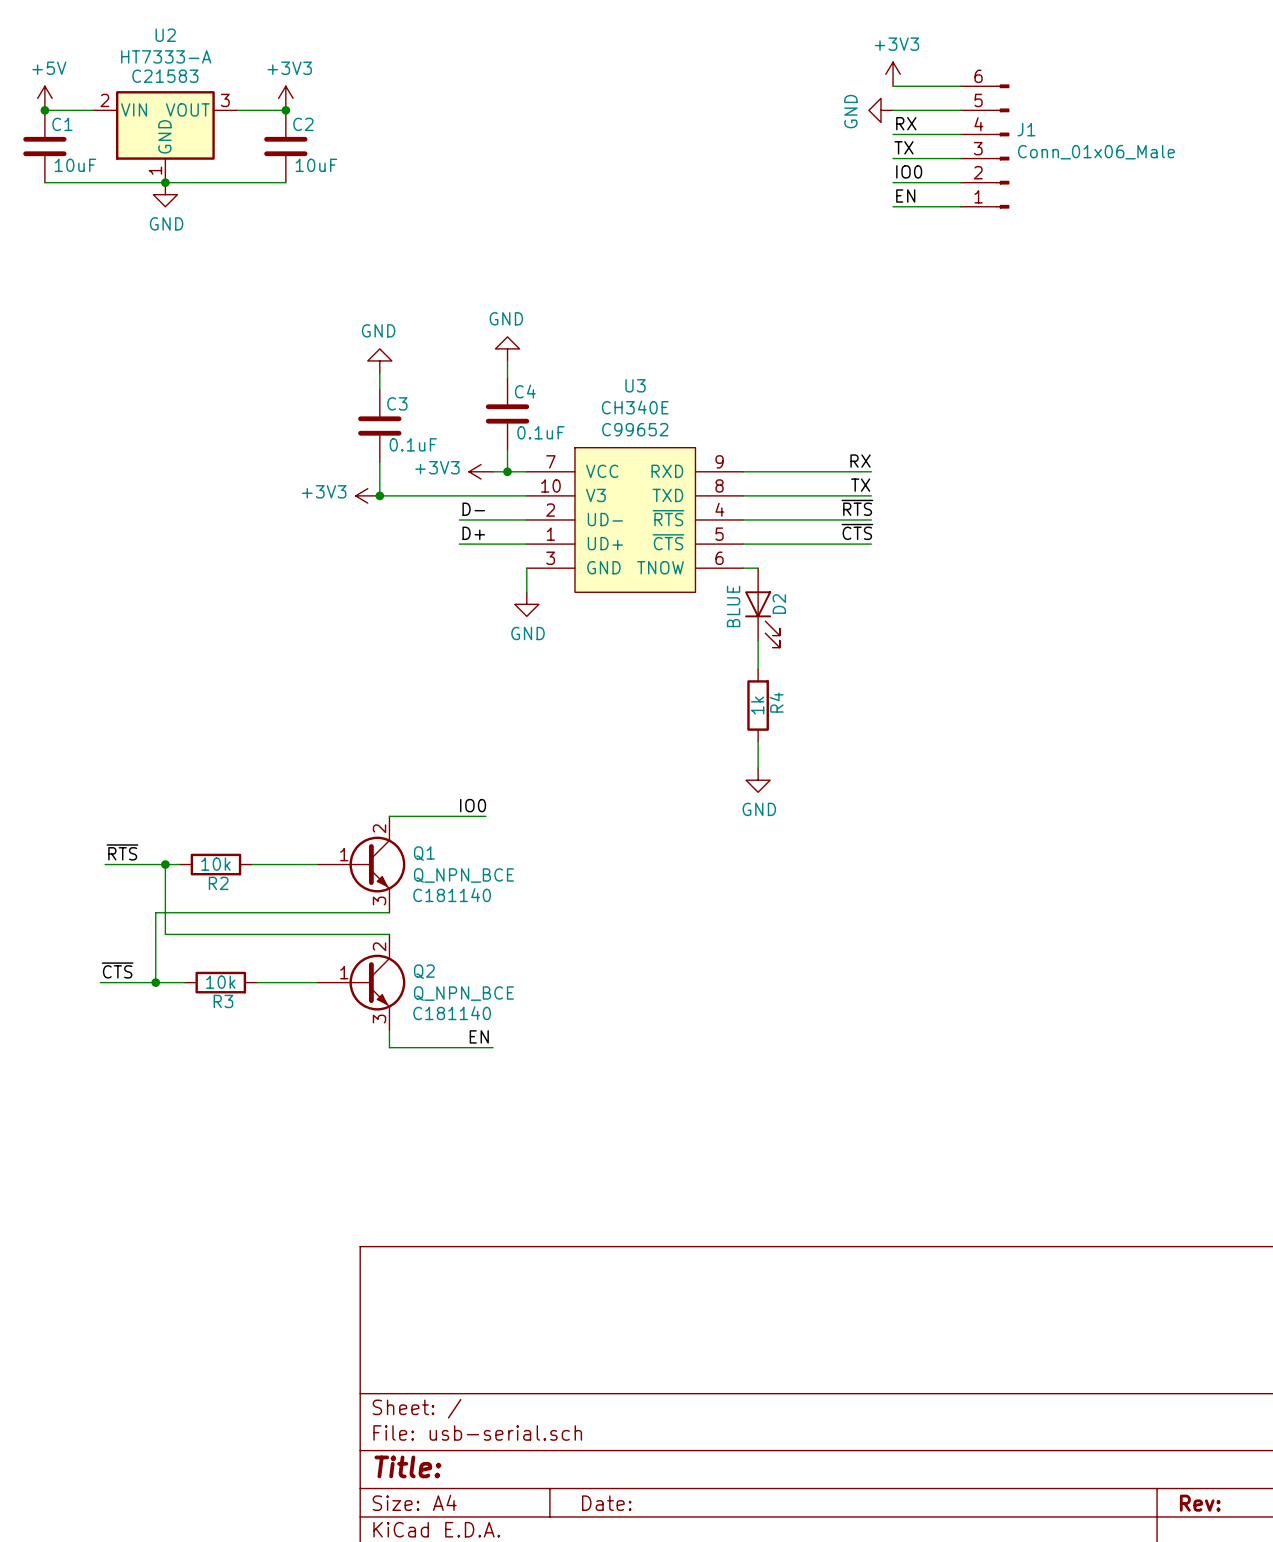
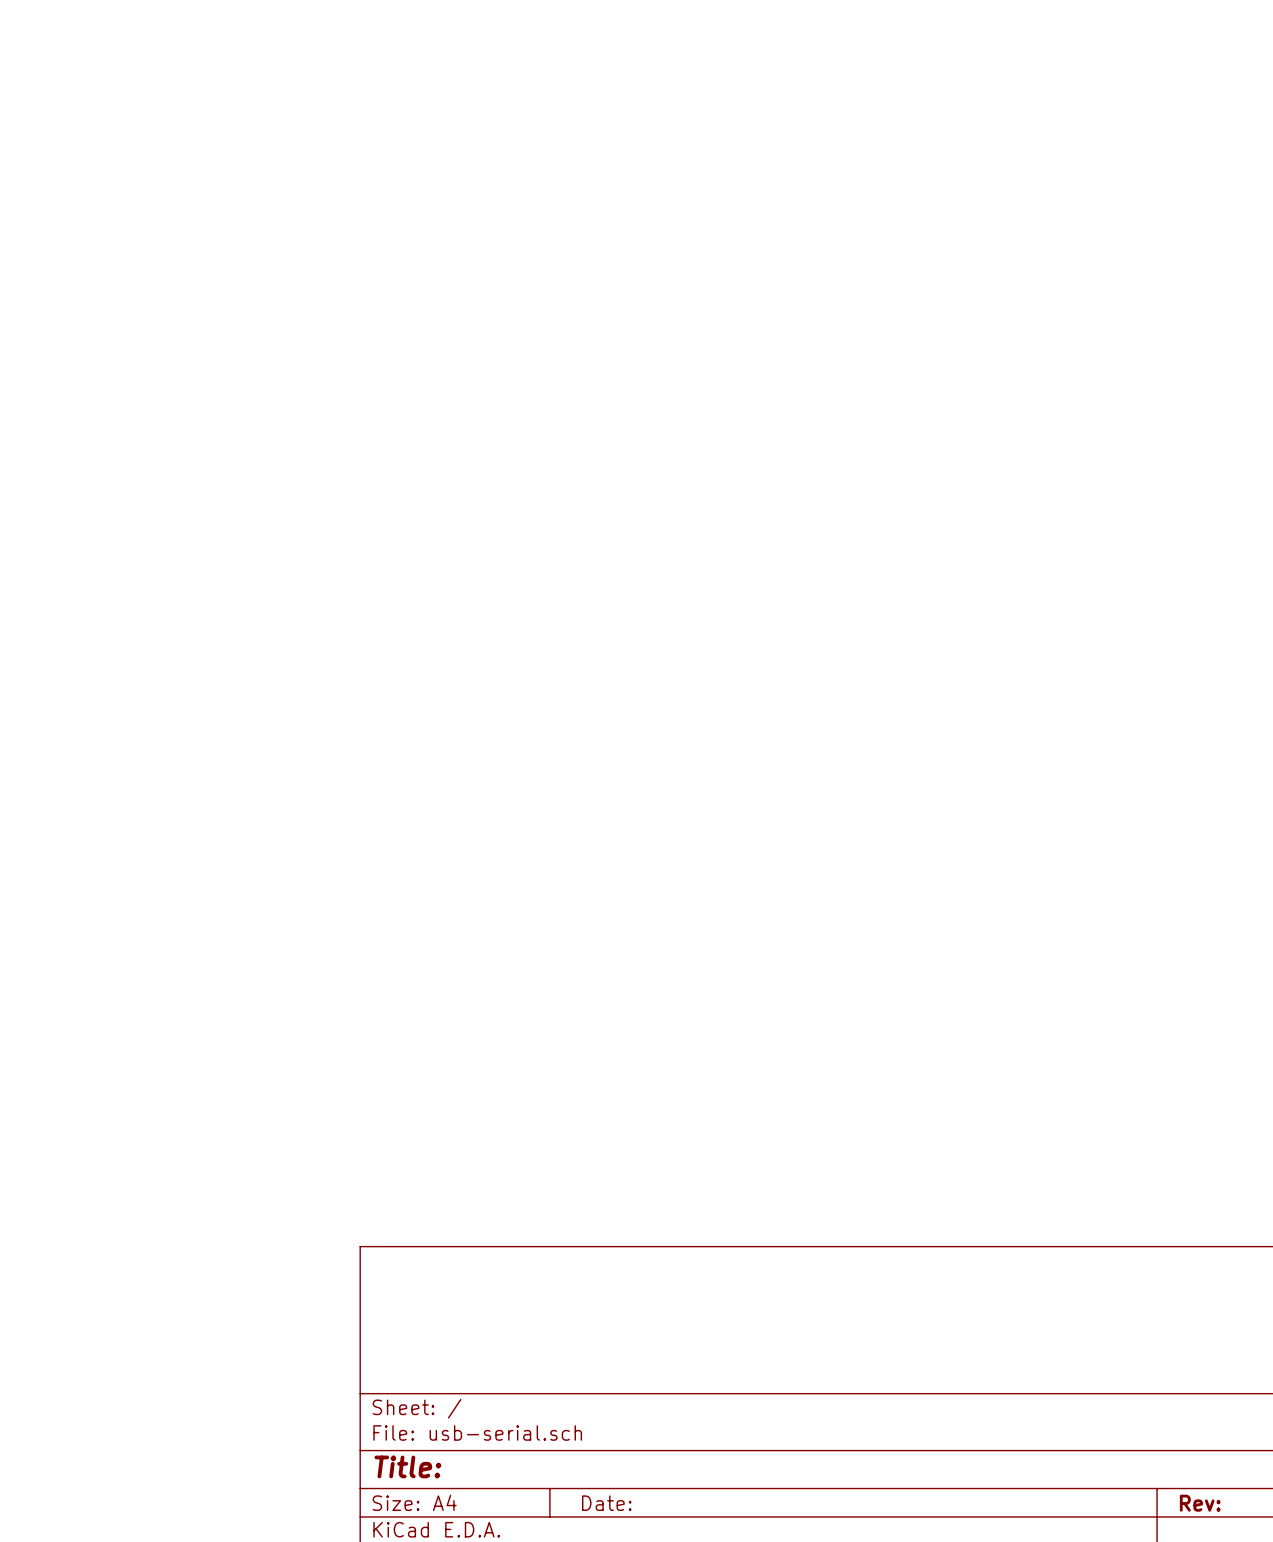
power symbol: +3V3 (893, 74) -> none
wire: (893, 86) (960, 86) -> none
power symbol: +5V (44, 98) -> none
power symbol: +3V3 (285, 98) -> none
wire: (44, 110) (93, 110) -> none
junction: (44, 110) -> none
wire: (237, 110) (285, 110) -> none
junction: (285, 110) -> none
power symbol: GND (880, 110) -> none
wire: (893, 110) (960, 110) -> none
label: RX (906, 123) -> none
wire: (893, 134) (960, 134) -> none
U2: HT7333-A (165, 136) -> none
C1: 10uF (44, 146) -> none
C2: 10uF (285, 146) -> none
J1: Conn_01x06_Male (984, 146) -> none
label: TX (904, 147) -> none
wire: (893, 158) (960, 158) -> none
label: IO0 (909, 171) -> none
wire: (44, 182) (285, 182) -> none
junction: (165, 182) -> none
wire: (893, 182) (960, 182) -> none
power symbol: GND (165, 194) -> none
label: EN (905, 196) -> none
wire: (893, 206) (960, 206) -> none
power symbol: GND (507, 348) -> none
power symbol: GND (379, 360) -> none
wire: (507, 360) (507, 377) -> none
wire: (379, 373) (379, 389) -> none
C4: 0.1uF (507, 413) -> none
C3: 0.1uF (379, 426) -> none
wire: (507, 450) (507, 471) -> none
label: RX (860, 461) -> none
wire: (379, 462) (379, 495) (526, 495) -> none
power symbol: +3V3 (481, 471) -> none
wire: (493, 471) (526, 471) -> none
junction: (507, 471) -> none
wire: (743, 471) (871, 471) -> none
label: TX (860, 485) -> none
power symbol: +3V3 (367, 495) -> none
junction: (379, 495) -> none
wire: (743, 495) (871, 495) -> none
label: ~{RTS} (857, 507) -> none
label: D- (473, 509) -> none
wire: (459, 519) (526, 519) -> none
U3: CH340E (635, 519) -> none
wire: (743, 519) (871, 519) -> none
label: ~{CTS} (857, 531) -> none
label: D+ (473, 533) -> none
wire: (459, 544) (526, 544) -> none
wire: (743, 544) (871, 544) -> none
wire: (526, 568) (526, 592) -> none
wire: (743, 568) (758, 568) -> none
power symbol: GND (526, 604) -> none
D2: BLUE (762, 607) -> none
wire: (758, 640) (758, 669) -> none
R4: 1k (758, 705) -> none
wire: (758, 741) (758, 768) -> none
power symbol: GND (758, 780) -> none
label: IO0 (473, 805) -> none
wire: (389, 816) (485, 816) -> none
label: ~{RTS} (122, 852) -> none
wire: (105, 864) (179, 864) -> none
wire: (165, 864) (165, 934) (389, 934) -> none
junction: (165, 864) -> none
R2: 10k (215, 864) -> none
wire: (252, 864) (317, 864) -> none
Q1: Q_NPN_BCE (361, 864) -> none
wire: (389, 912) (155, 912) (155, 982) -> none
label: ~{CTS} (117, 970) -> none
wire: (100, 982) (184, 982) -> none
junction: (155, 982) -> none
R3: 10k (220, 982) -> none
wire: (256, 982) (317, 982) -> none
Q2: Q_NPN_BCE (361, 982) -> none
wire: (389, 1030) (389, 1047) (493, 1047) -> none
label: EN (479, 1036) -> none

